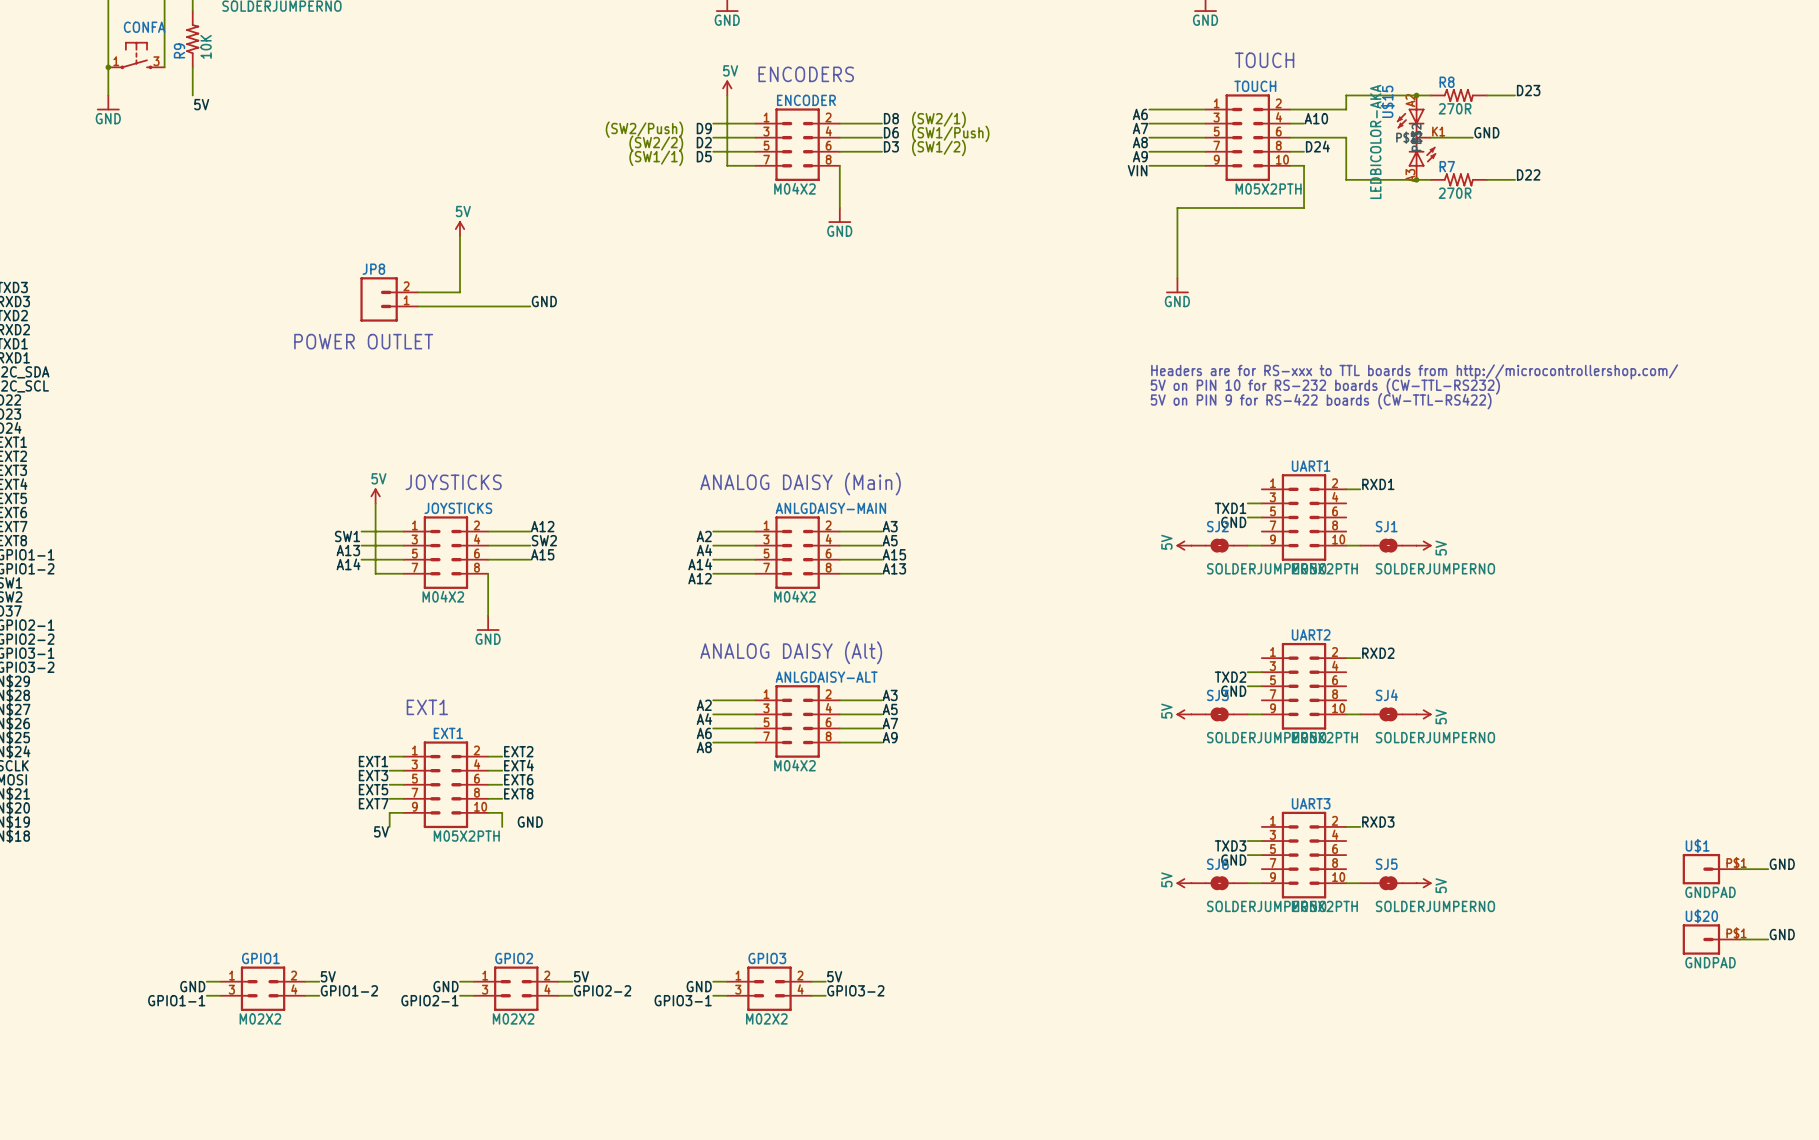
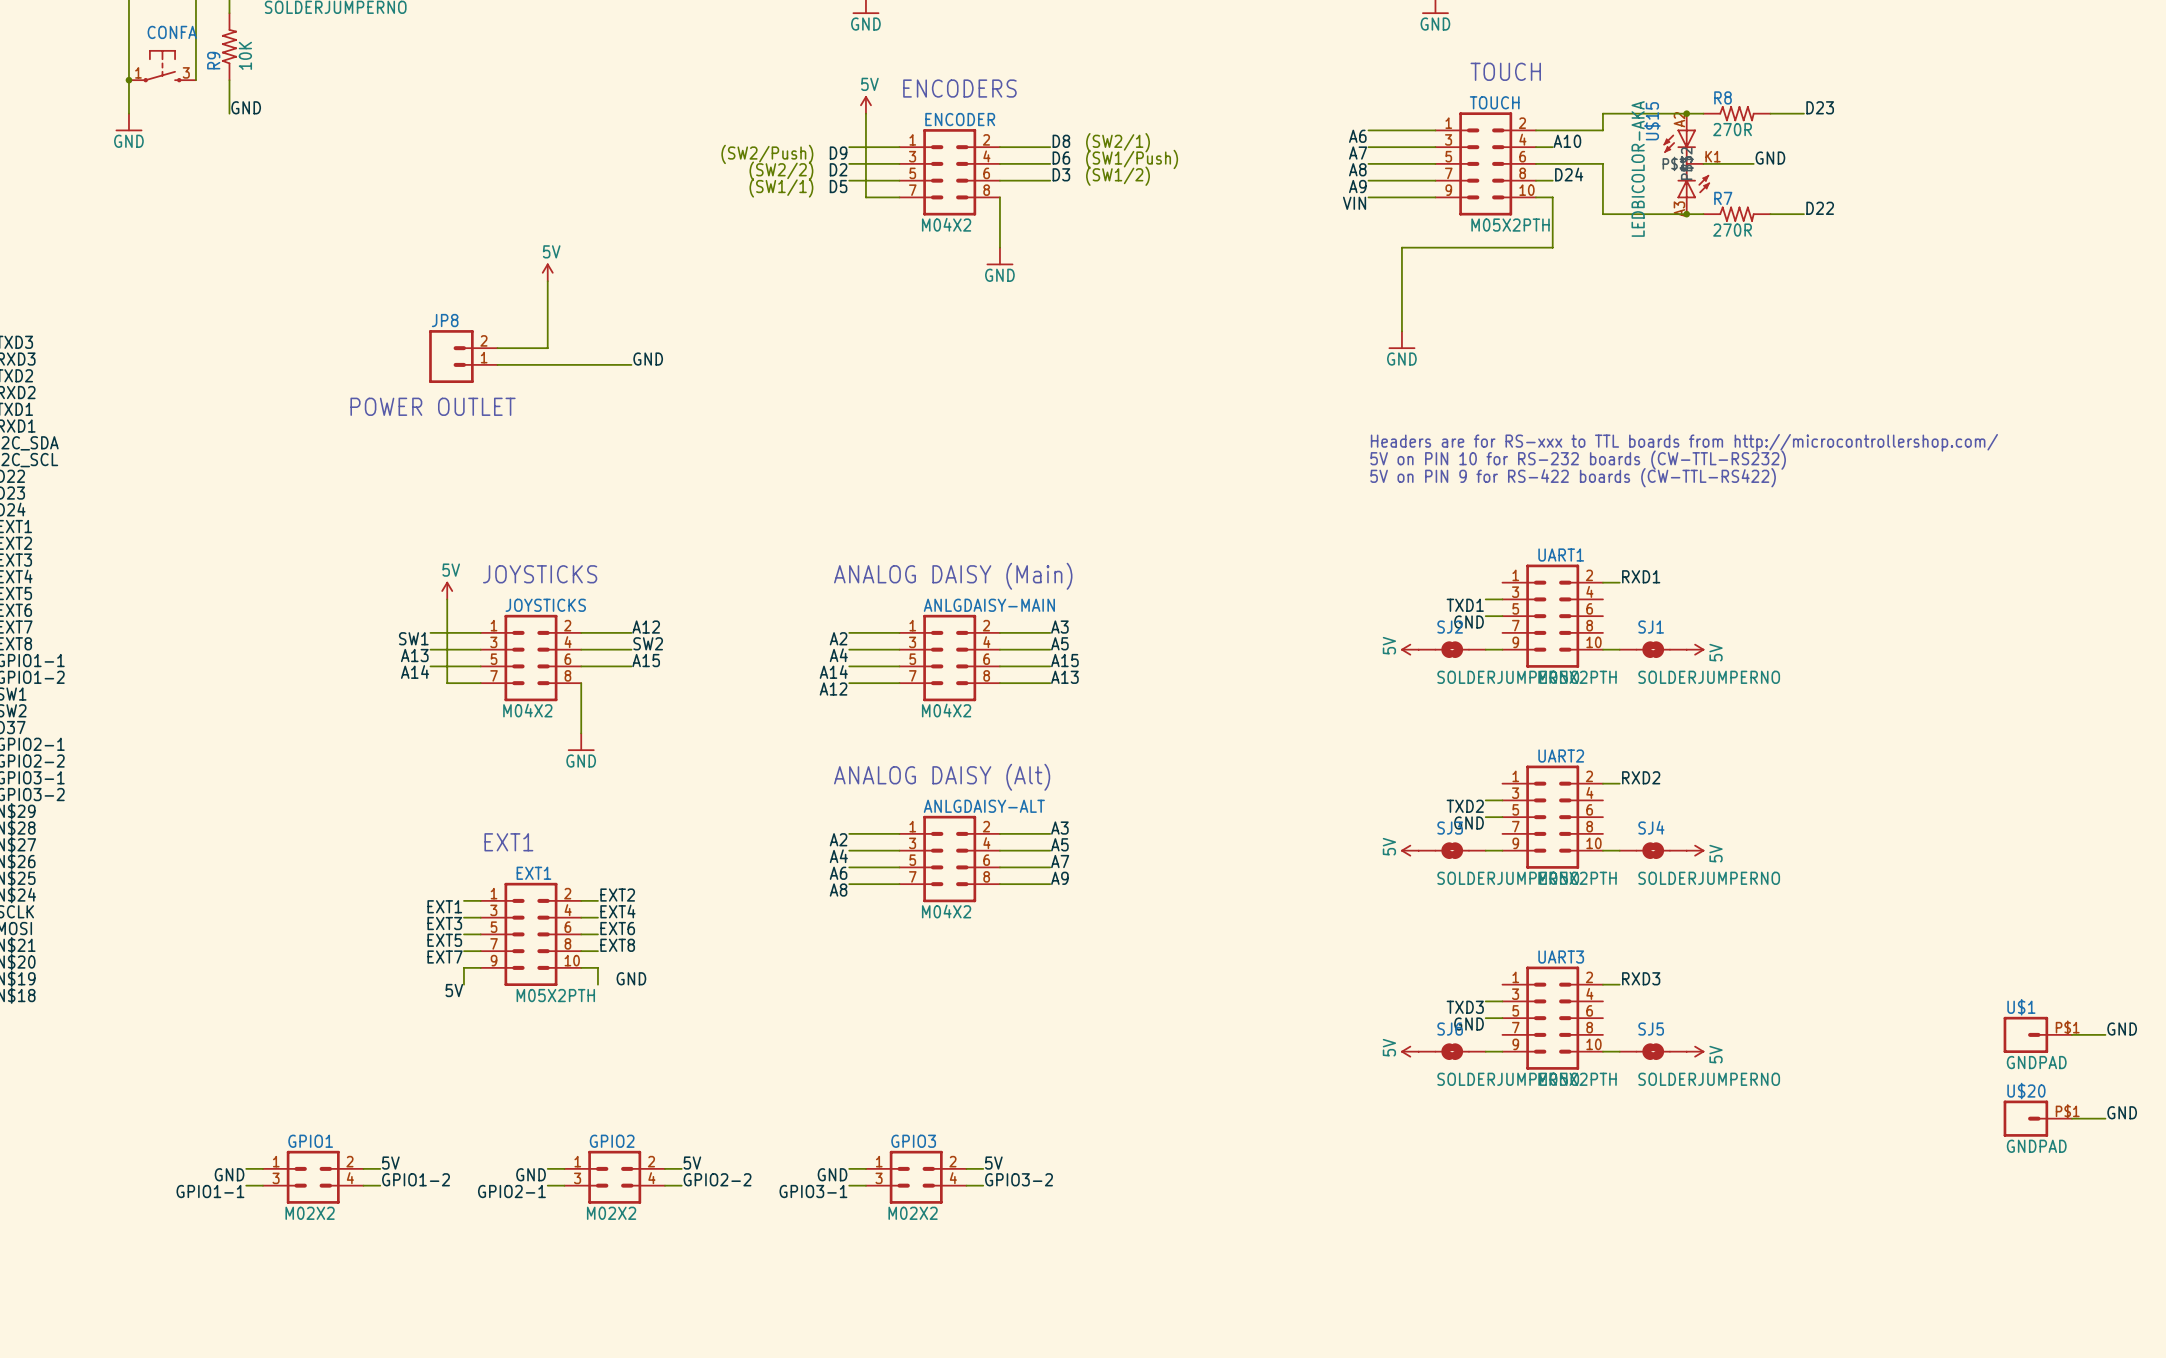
label: none -> GND (246, 107)
label: 5V (201, 104) -> none

